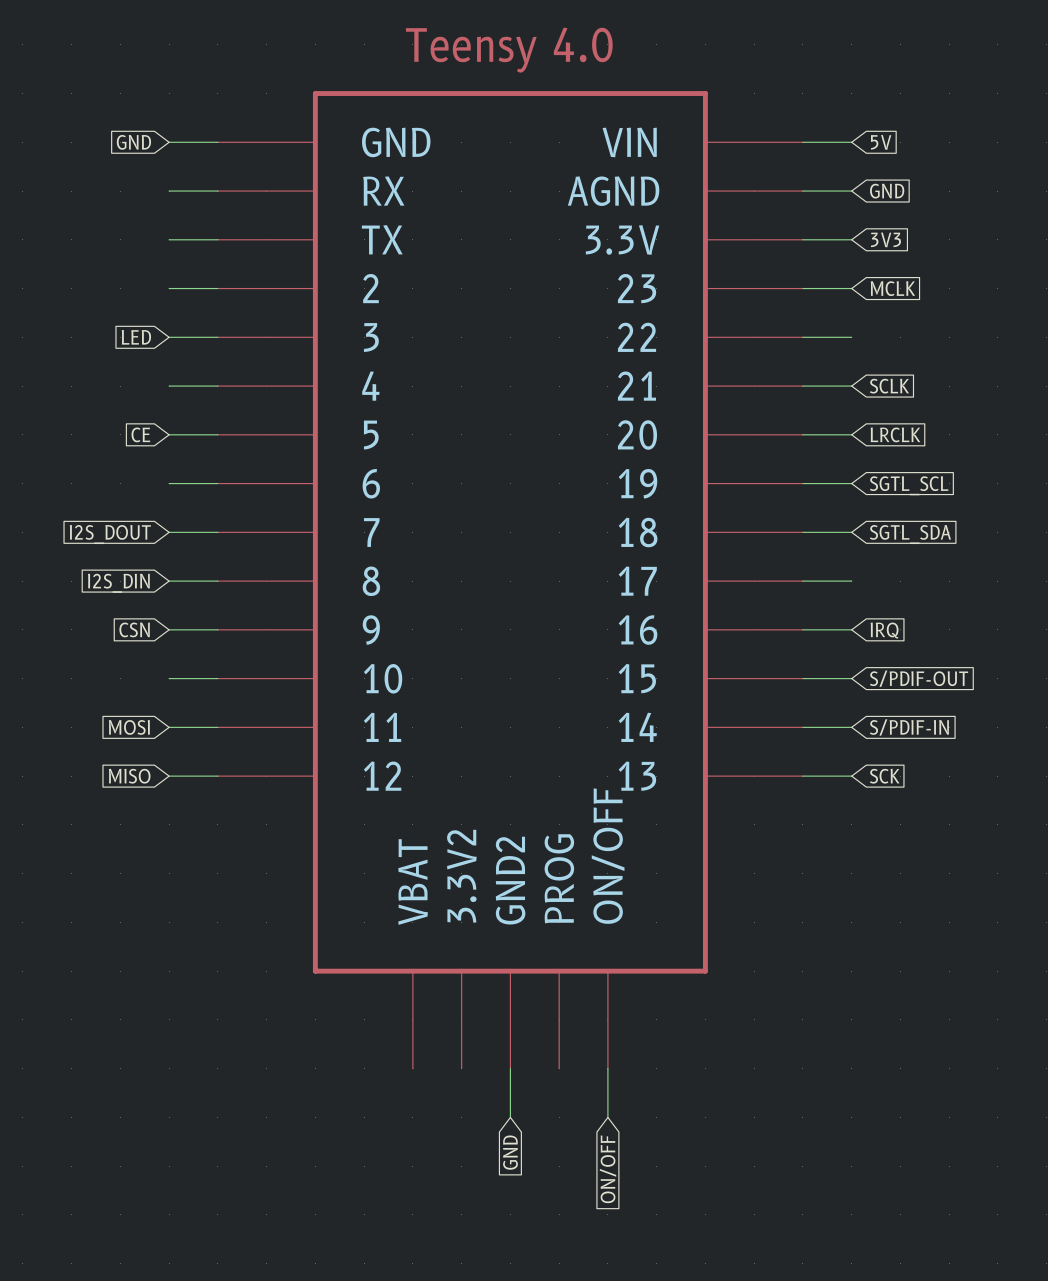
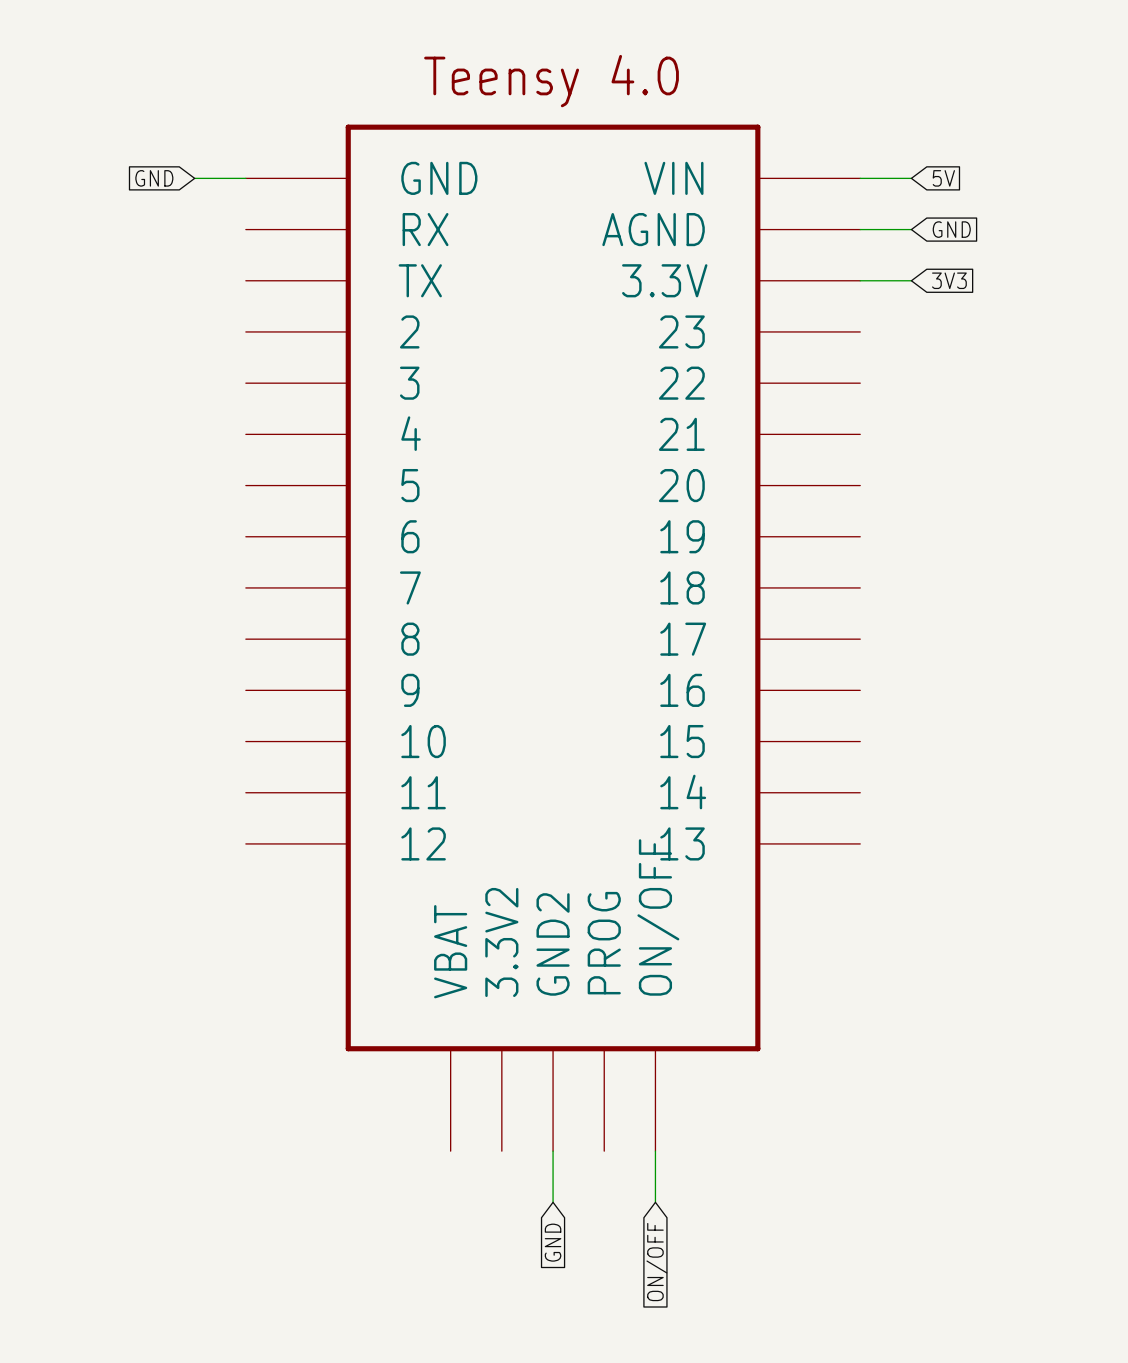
wire: (169, 191) (217, 191) -> none
wire: (169, 239) (217, 239) -> none
wire: (169, 288) (217, 288) -> none
wire: (802, 288) (851, 288) -> none
global label: MCLK (892, 288) -> none
global label: LED (136, 337) -> none
wire: (169, 337) (217, 337) -> none
wire: (802, 337) (851, 337) -> none
wire: (169, 386) (217, 386) -> none
wire: (802, 386) (851, 386) -> none
global label: SCLK (889, 386) -> none
global label: CE (140, 434) -> none
wire: (169, 434) (217, 434) -> none
wire: (802, 434) (851, 434) -> none
global label: LRCLK (895, 434) -> none
wire: (169, 483) (217, 483) -> none
wire: (802, 483) (851, 483) -> none
global label: SGTL_SCL (909, 485) -> none
wire: (169, 532) (217, 532) -> none
wire: (802, 532) (851, 532) -> none
global label: I2S_DOUT (110, 534) -> none
global label: SGTL_SDA (910, 534) -> none
wire: (169, 581) (217, 581) -> none
wire: (802, 581) (851, 581) -> none
global label: I2S_DIN (118, 583) -> none
global label: CSN (134, 629) -> none
wire: (169, 629) (217, 629) -> none
wire: (802, 629) (851, 629) -> none
global label: IRQ (884, 630) -> none
wire: (169, 678) (217, 678) -> none
wire: (802, 678) (851, 678) -> none
global label: S/PDIF-OUT (919, 678) -> none
global label: MOSI (129, 727) -> none
wire: (169, 727) (217, 727) -> none
wire: (802, 727) (851, 727) -> none
global label: S/PDIF-IN (909, 727) -> none
global label: MISO (129, 776) -> none
wire: (169, 776) (217, 776) -> none
wire: (802, 776) (851, 776) -> none
global label: SCK (884, 776) -> none

